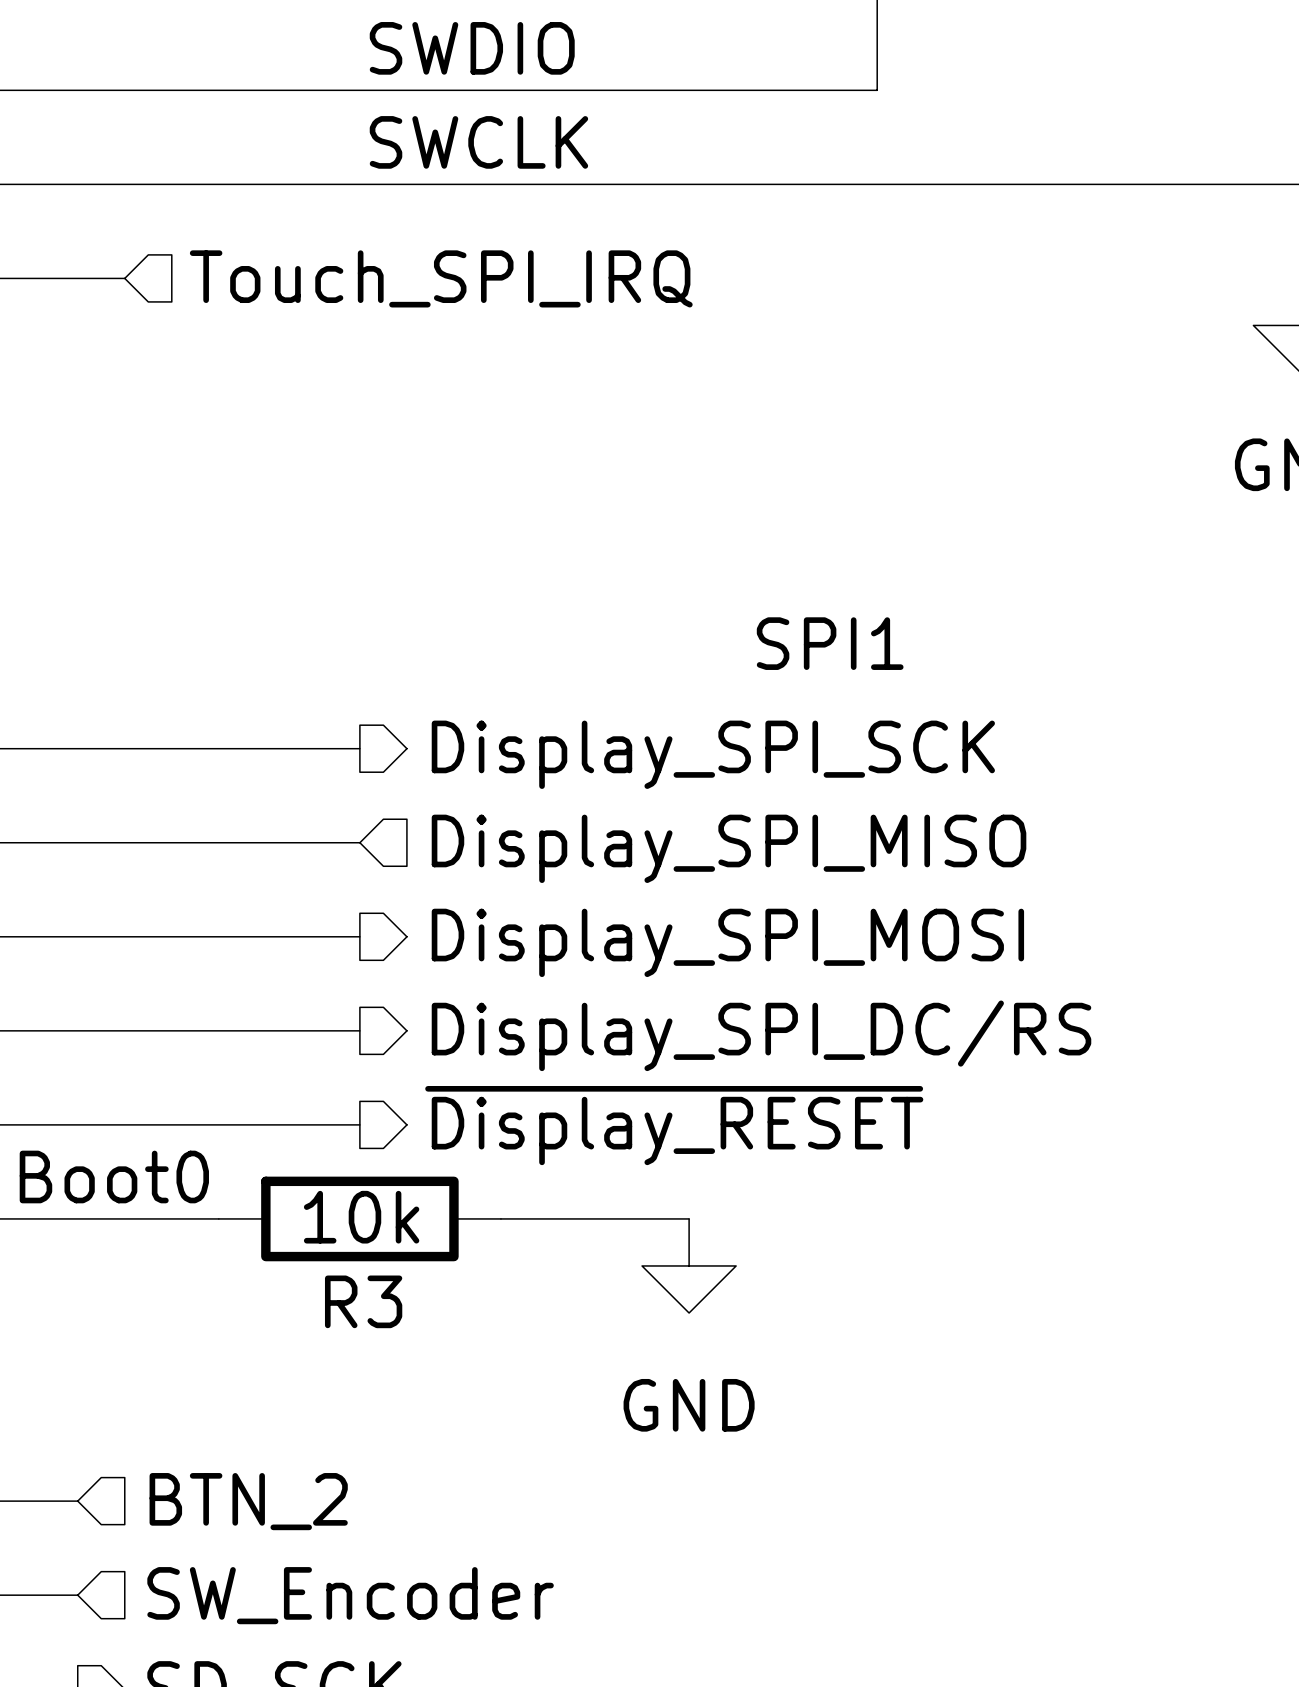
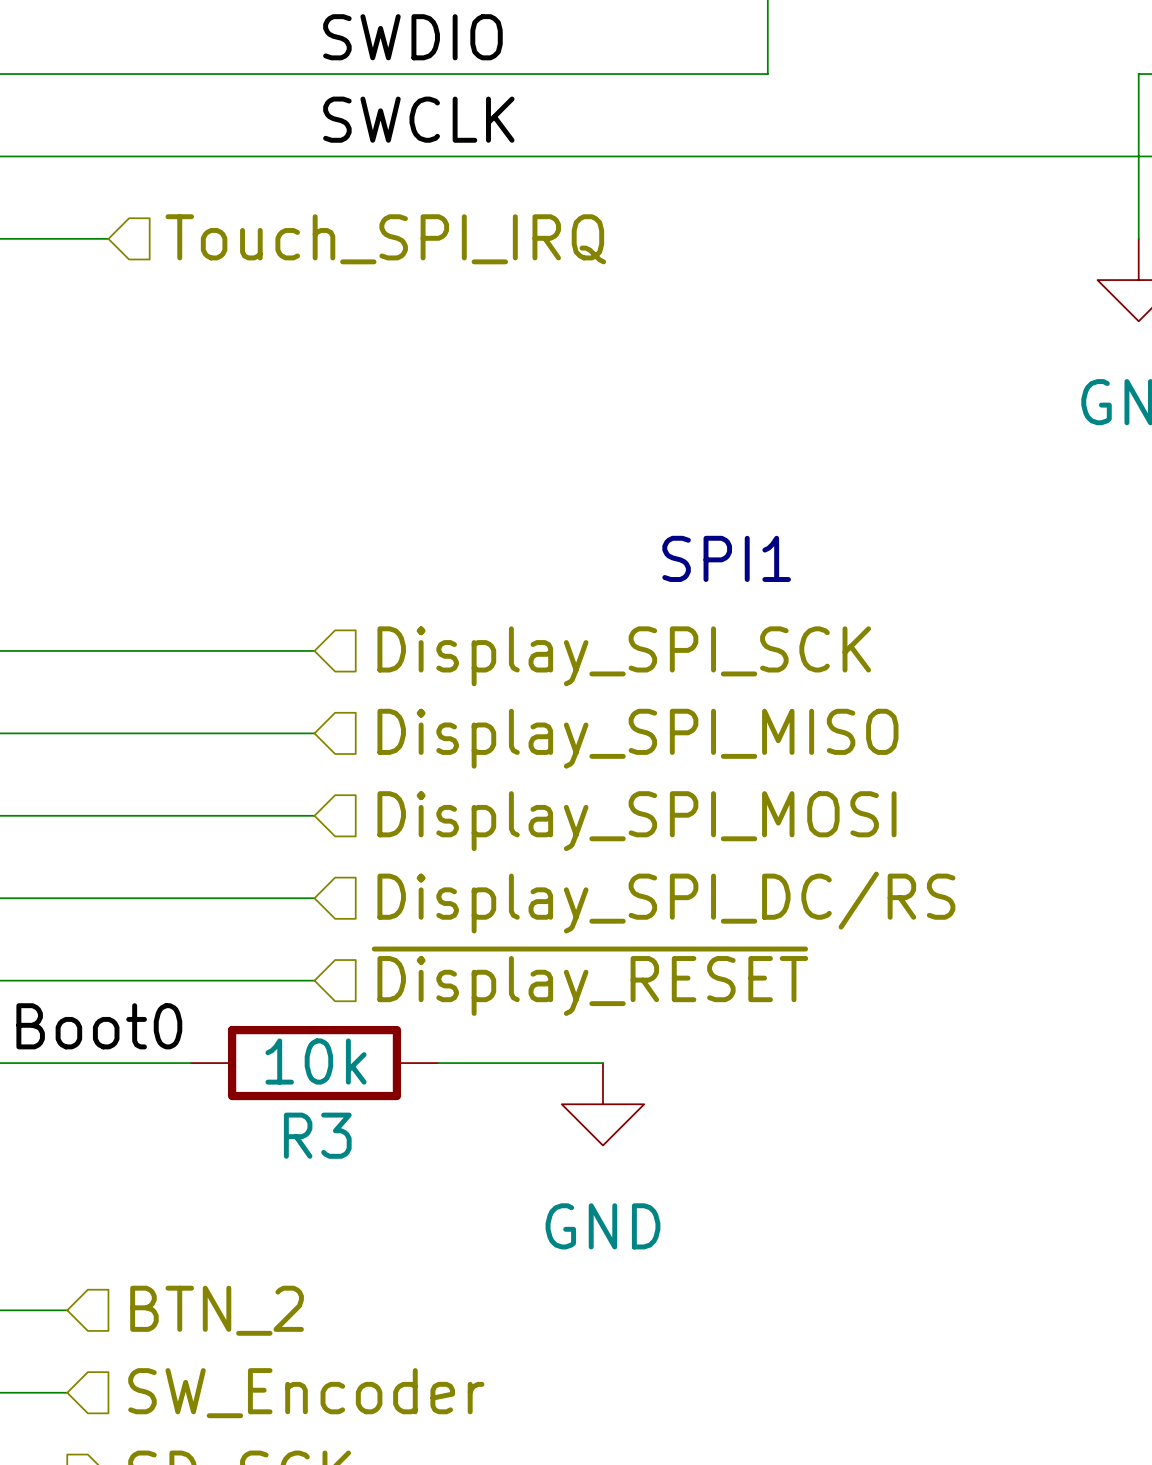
hierarchical label shape: output (713, 754) -> input (624, 656)
hierarchical label shape: output (727, 942) -> input (636, 821)
hierarchical label shape: output (761, 1035) -> input (666, 902)
hierarchical label shape: output (674, 1125) -> input (589, 981)

